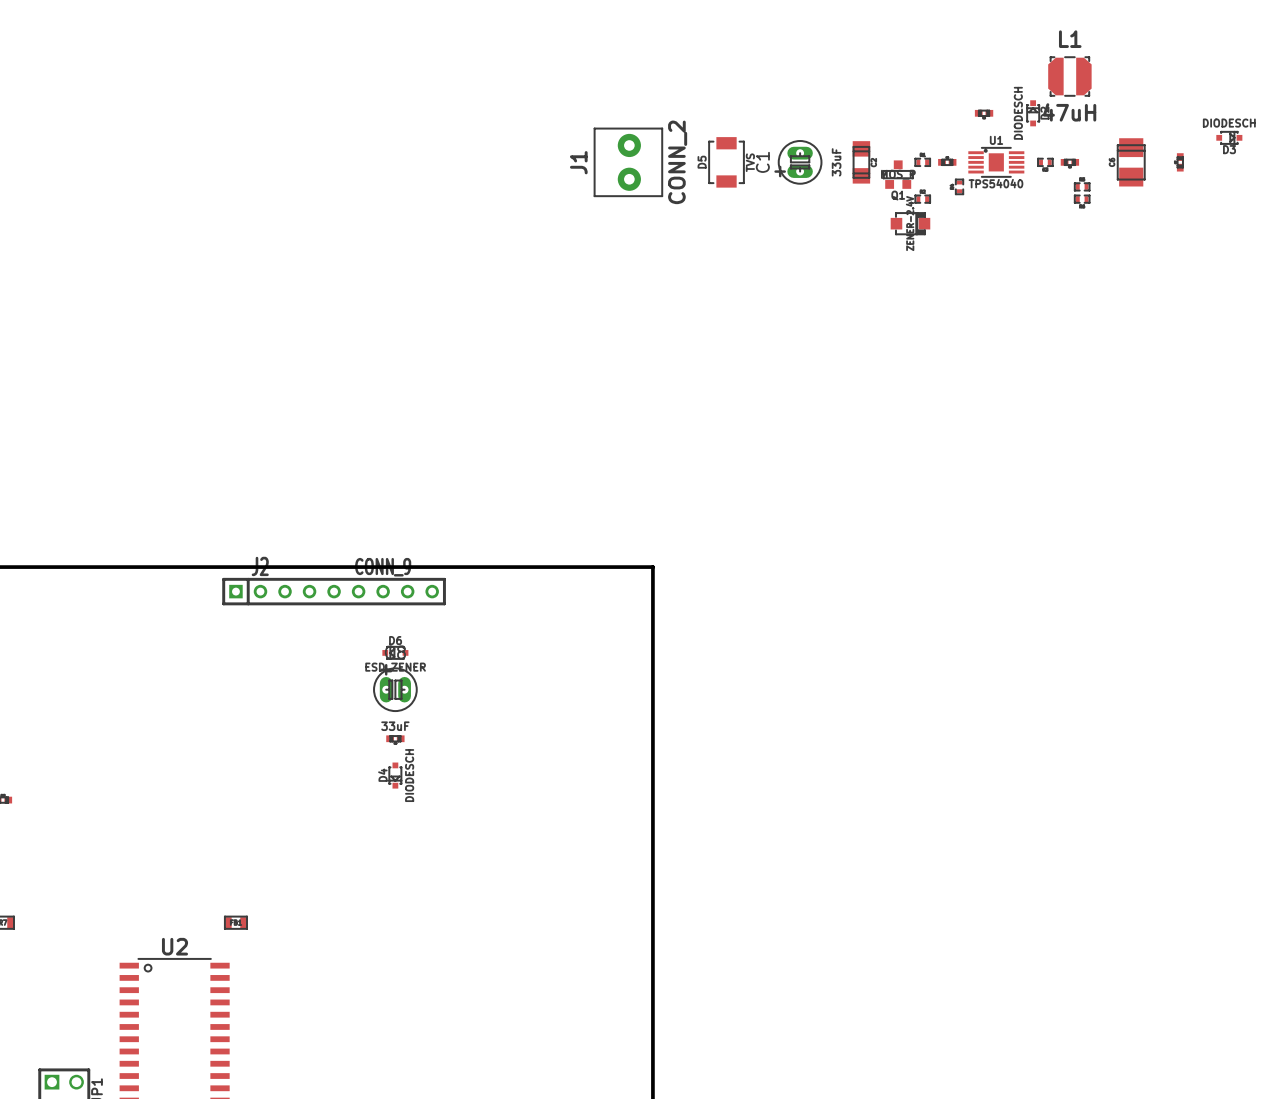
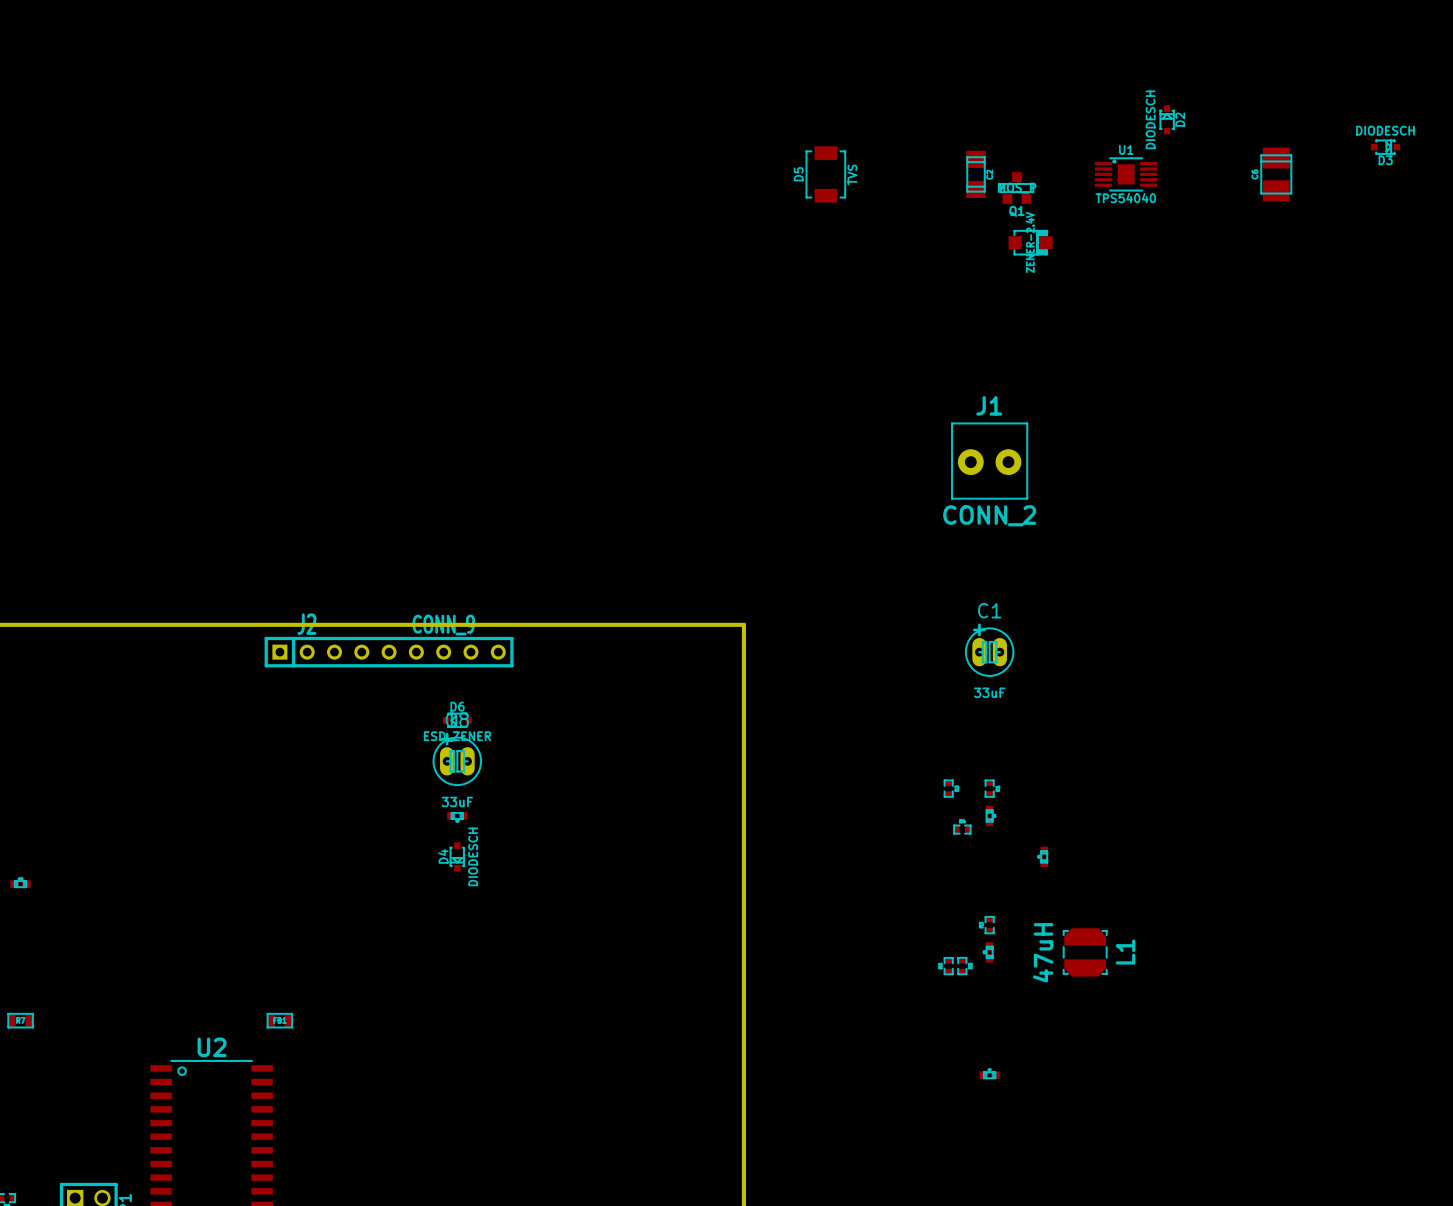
L1 rotation: 0° (1069, 76) -> 90° clockwise (1085, 952)
L1 position: (1069, 76) -> (1085, 952)
part rotation: 0° (984, 113) -> 90° clockwise (1044, 856)
part position: (984, 113) -> (1044, 856)
J1 rotation: 0° (628, 162) -> 90° clockwise (989, 461)
J1 position: (628, 162) -> (989, 461)
C1 rotation: 0° (798, 162) -> 90° clockwise (989, 649)
C1 position: (798, 162) -> (989, 649)
part rotation: 0° (922, 162) -> 90° clockwise (989, 788)
part position: (922, 162) -> (989, 788)
part rotation: 0° (947, 162) -> 90° clockwise (989, 815)
part position: (947, 162) -> (989, 815)
part rotation: 0° (1045, 162) -> 90° clockwise (989, 925)
part position: (1045, 162) -> (989, 925)
part rotation: 0° (1069, 162) -> 90° clockwise (989, 952)
part position: (1069, 162) -> (989, 952)
part rotation: 0° (1180, 162) -> 90° clockwise (989, 1075)
part position: (1180, 162) -> (989, 1075)
part rotation: 0° (959, 186) -> 90° clockwise (962, 829)
part position: (959, 186) -> (962, 829)
part rotation: 0° (1082, 186) -> 90° clockwise (962, 966)
part position: (1082, 186) -> (962, 966)
part rotation: 0° (922, 199) -> 90° clockwise (948, 788)
part position: (922, 199) -> (948, 788)
part rotation: 0° (1082, 199) -> 90° clockwise (948, 966)
part position: (1082, 199) -> (948, 966)

